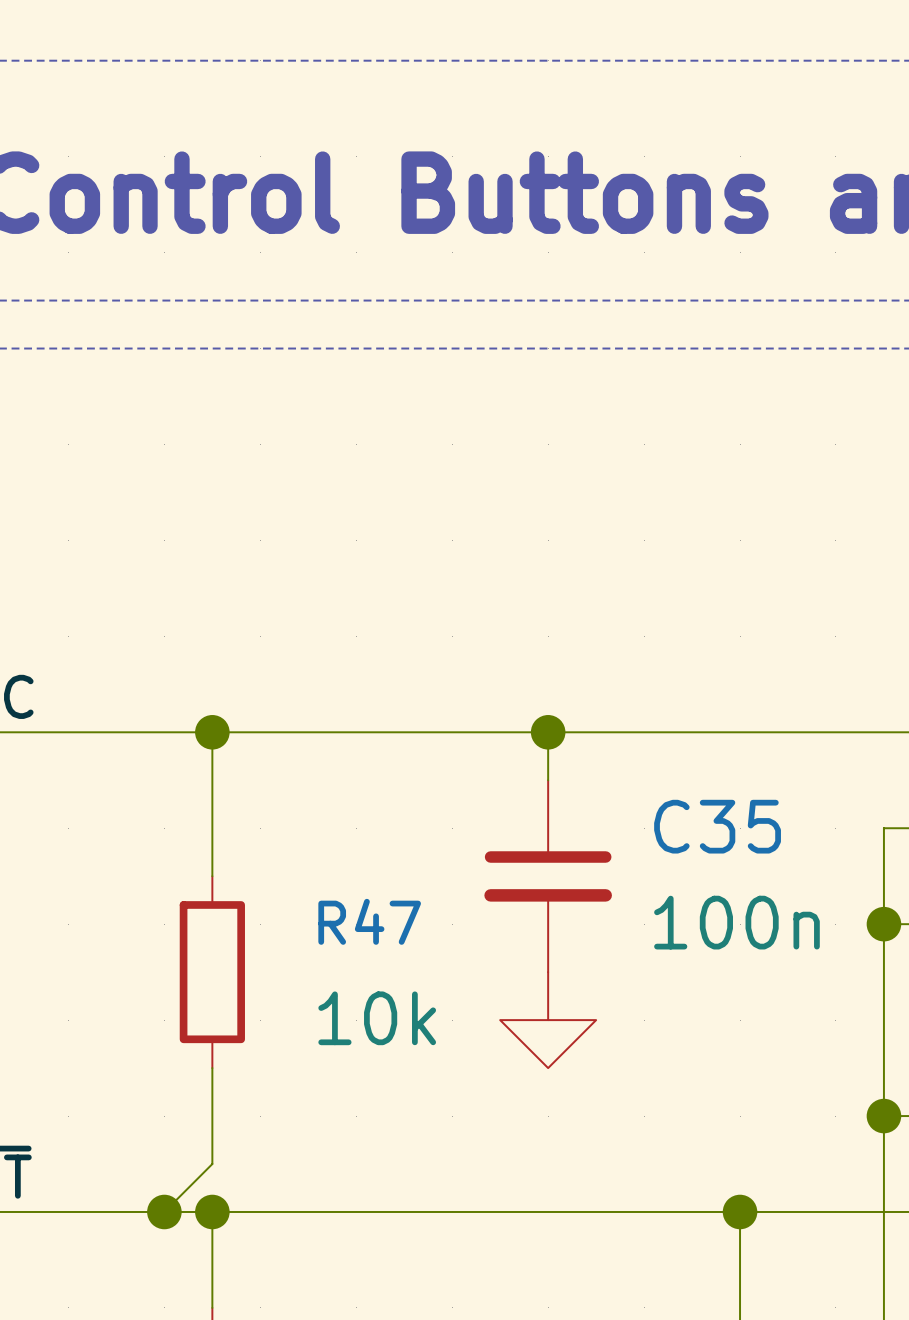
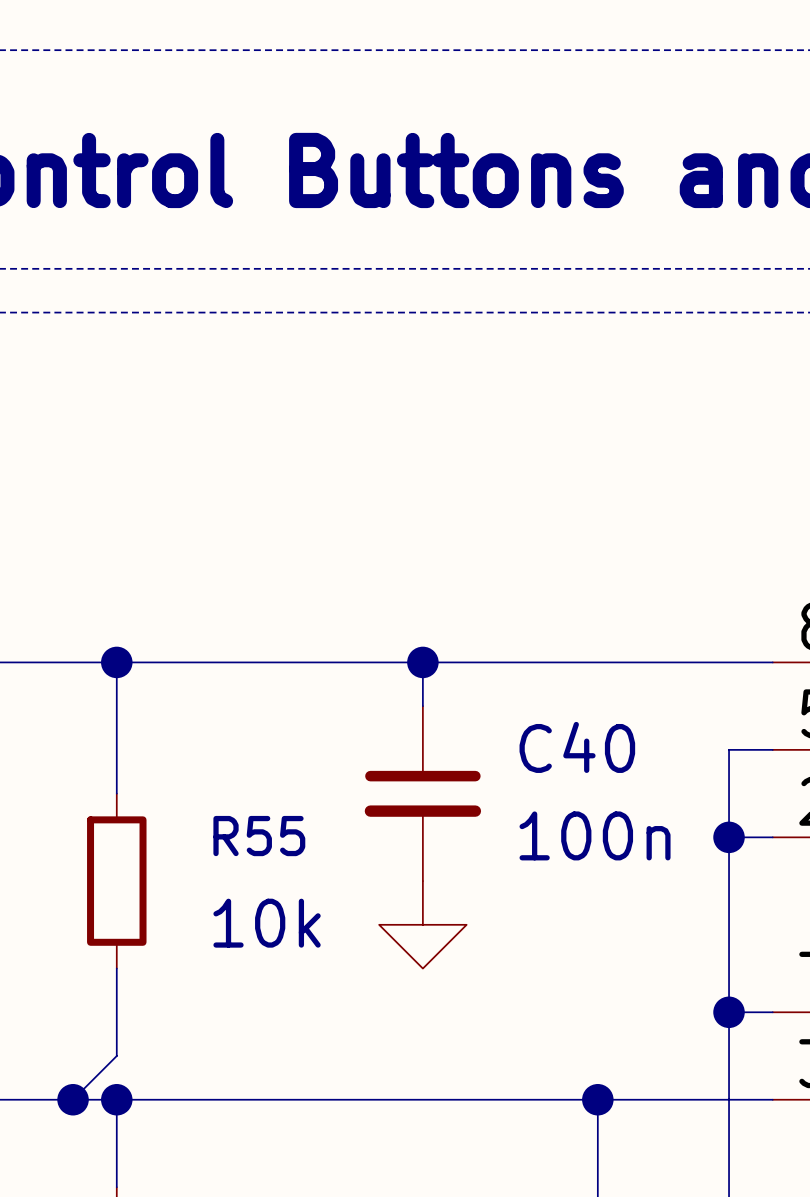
C35 name: C35 (717, 826) -> C40 (577, 747)
R47 name: R47 (369, 921) -> R55 (259, 836)

